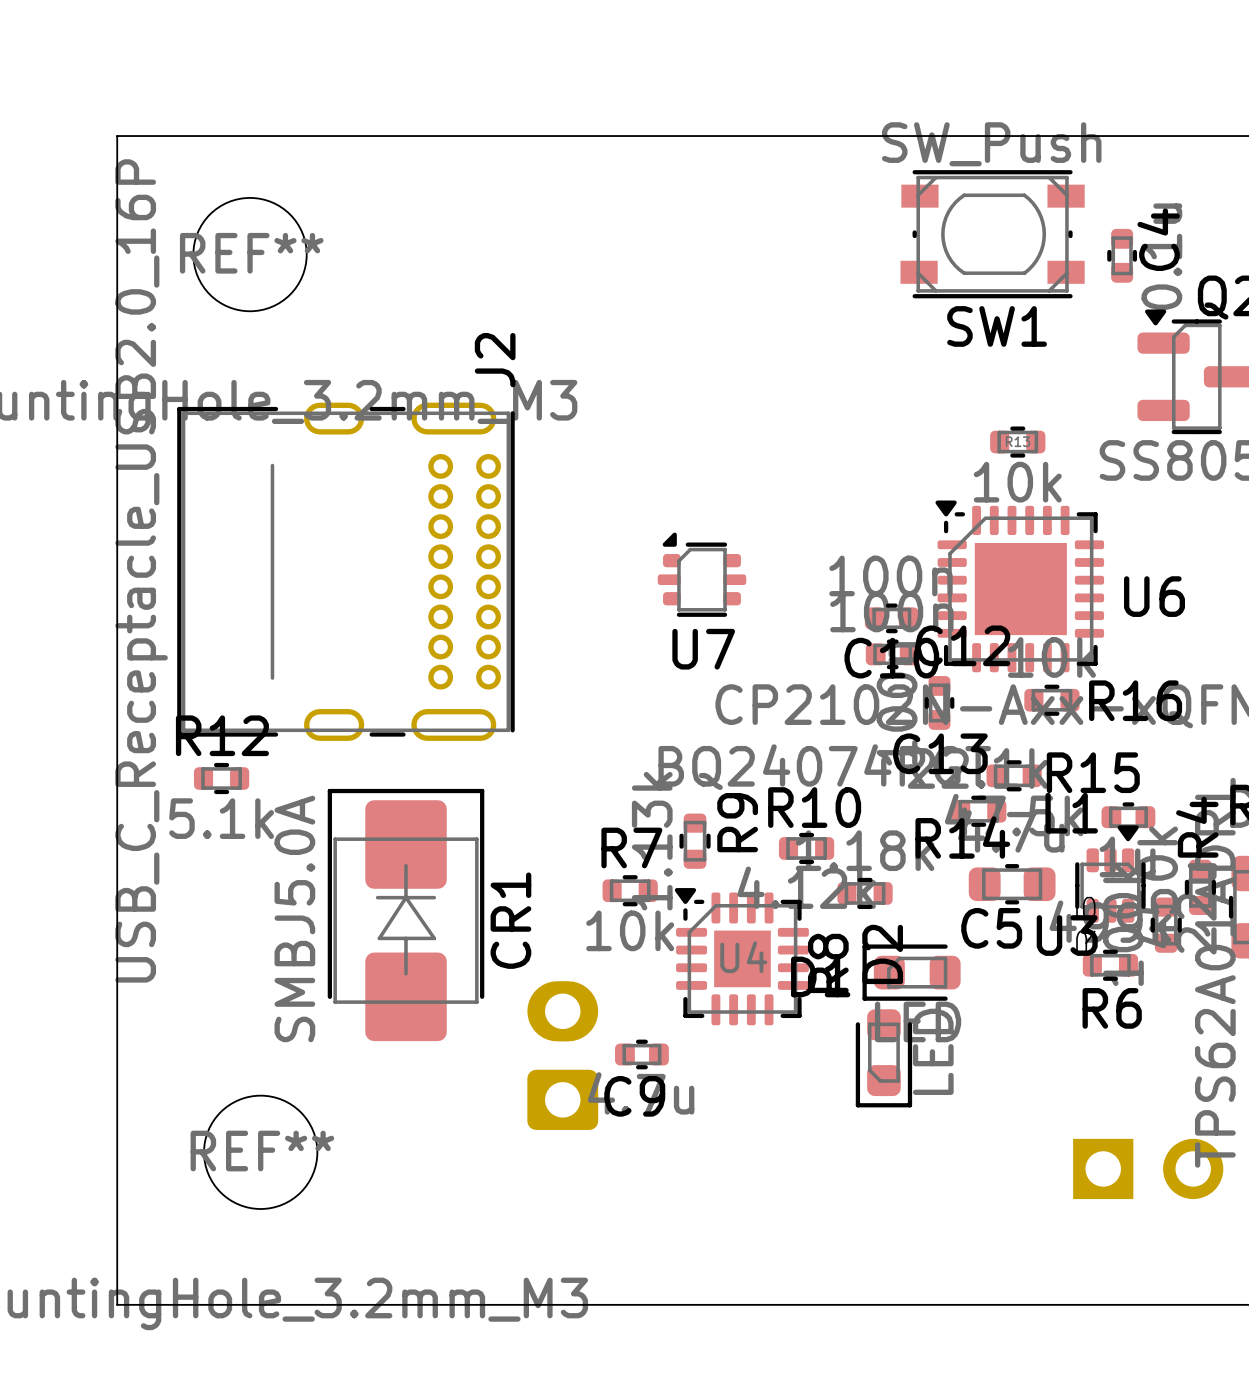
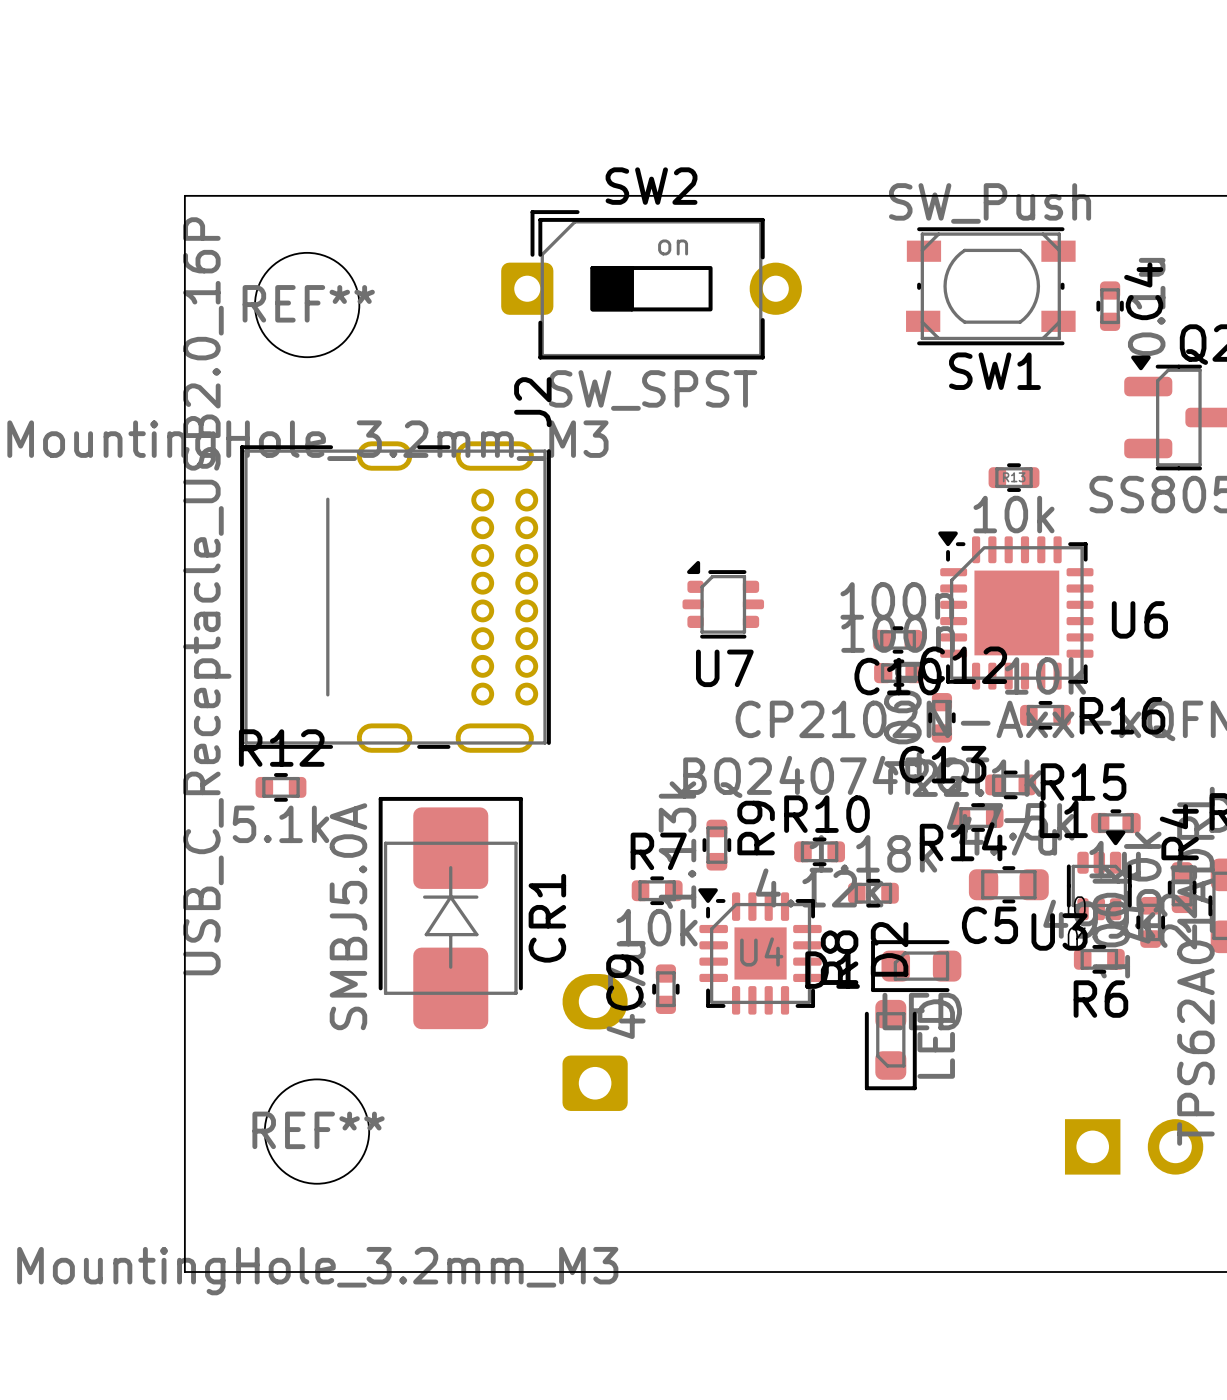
SW2: none -> SW_SPST (651, 284)
C9 rotation: 0° (641, 1054) -> 90° clockwise (665, 989)
C9 position: (641, 1054) -> (665, 989)

